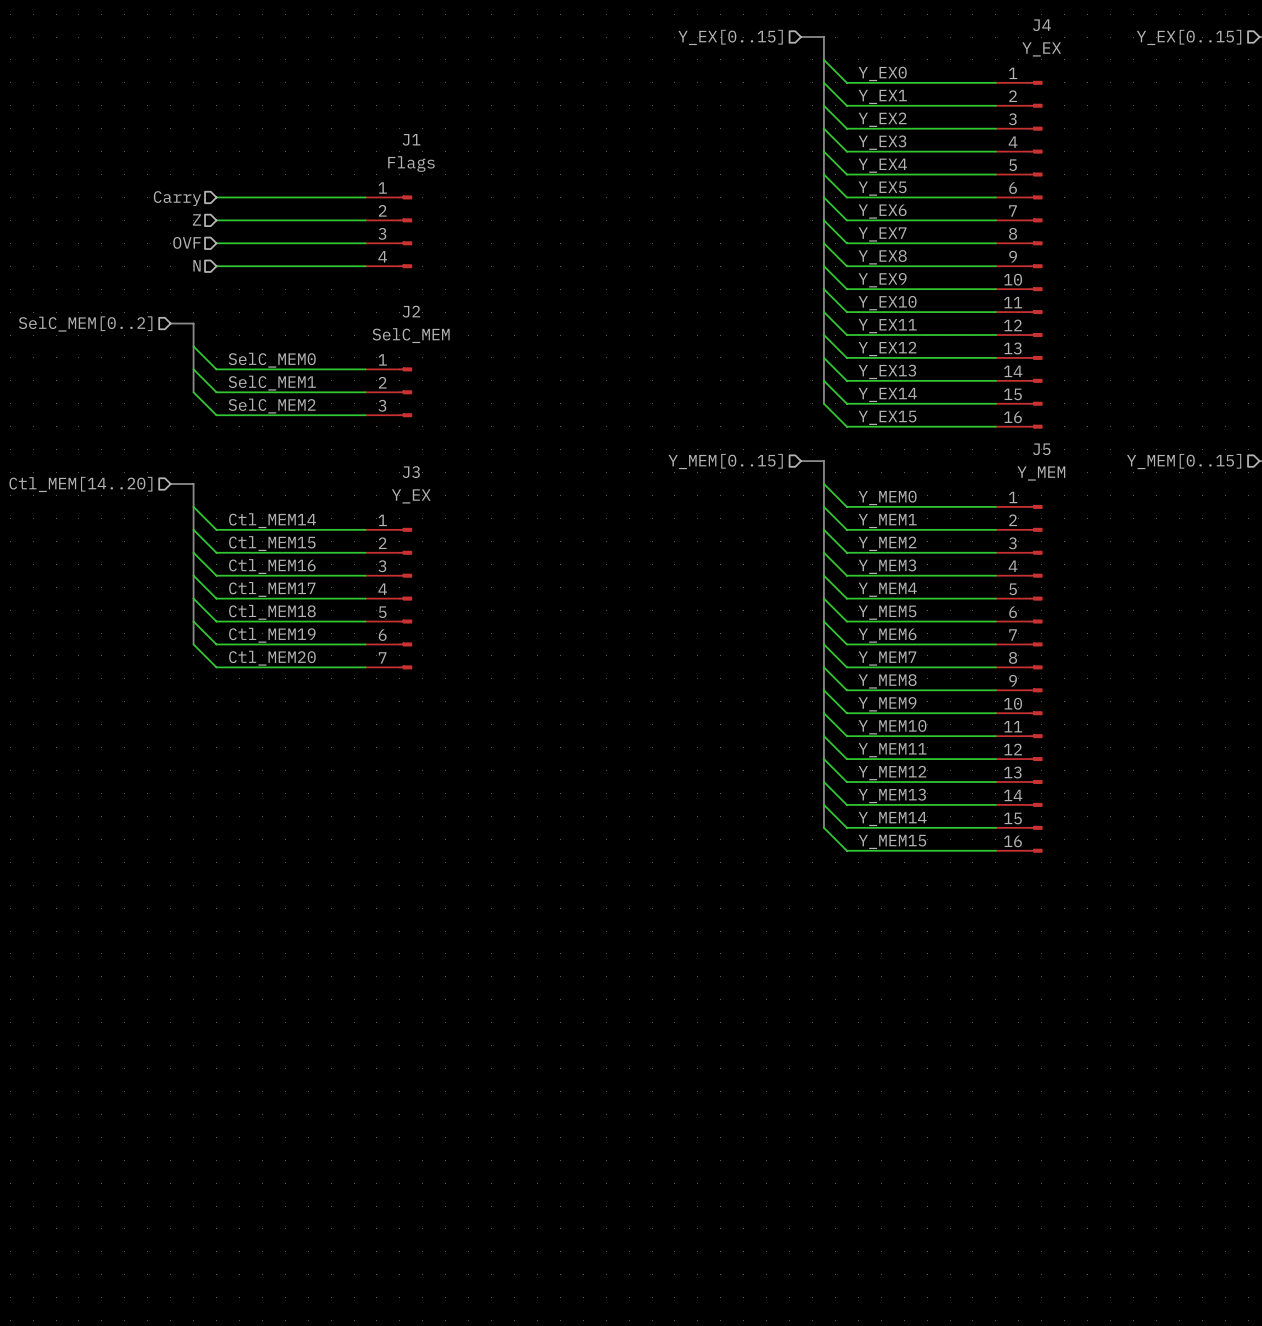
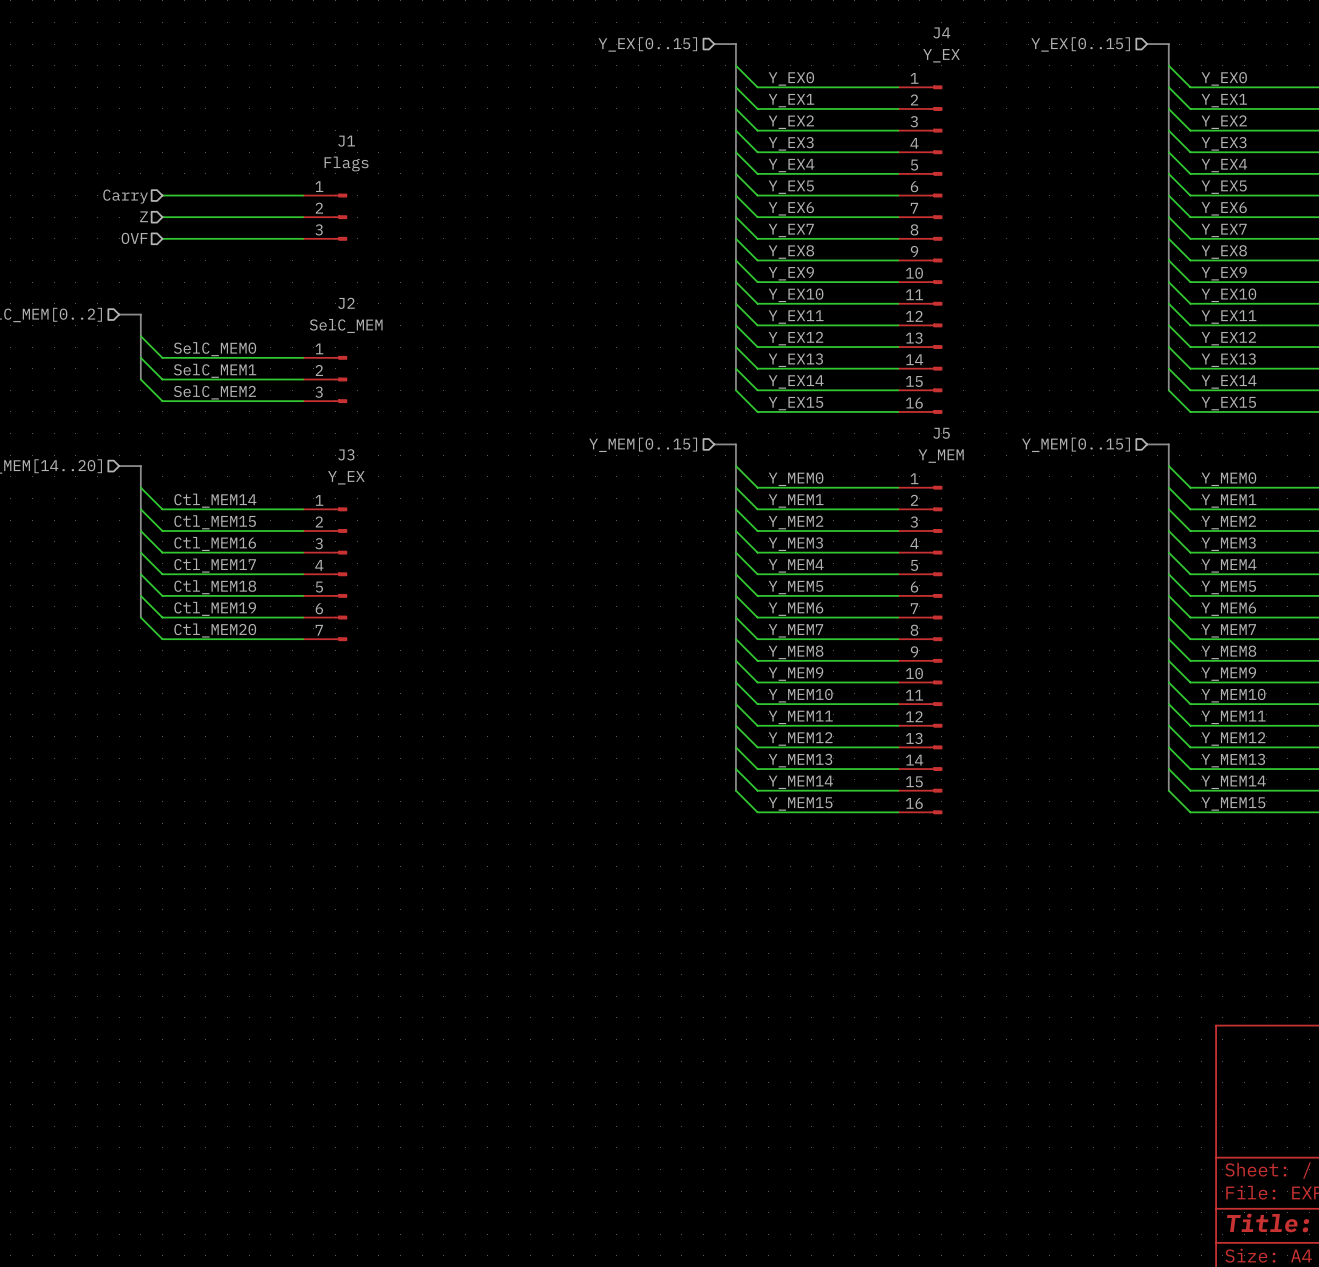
J1 symbol: [365, 195, 413, 269] -> [303, 193, 348, 241]
hierarchical label: N (197, 265) -> none
wire: (216, 266) (365, 266) -> none

